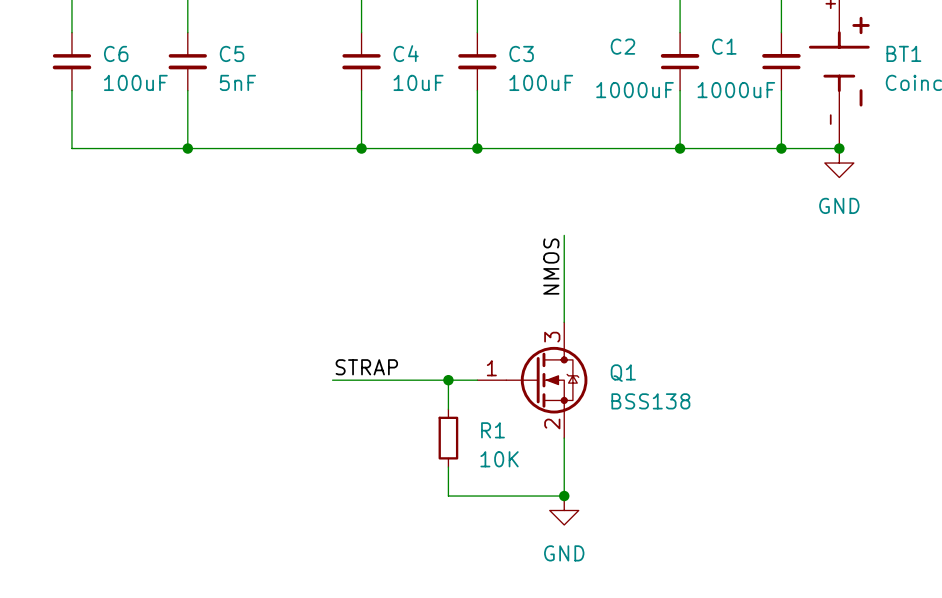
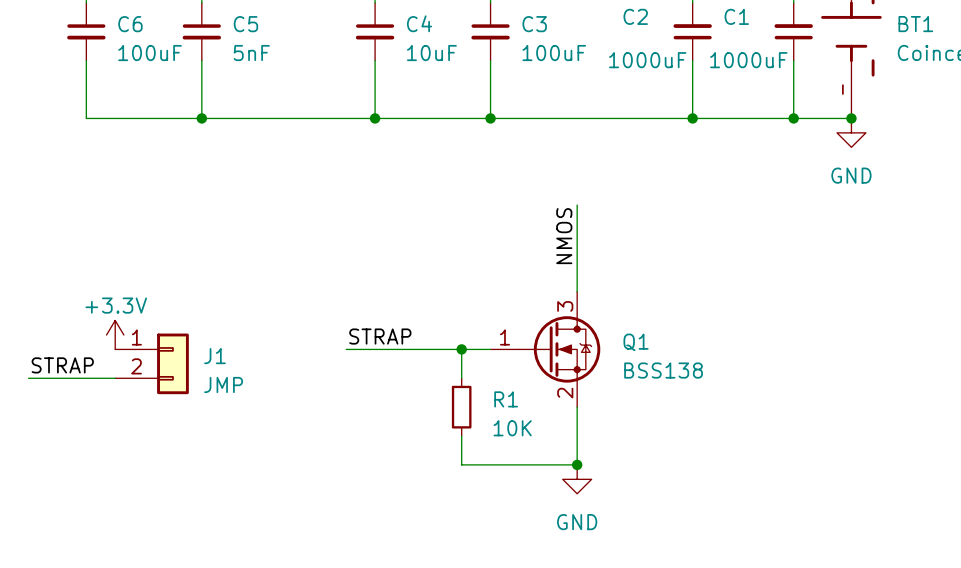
power symbol: none -> +3.3V (115, 334)
J1: none -> JMP (152, 363)
label: none -> STRAP (62, 365)
wire: none -> (28, 378) (115, 378)

